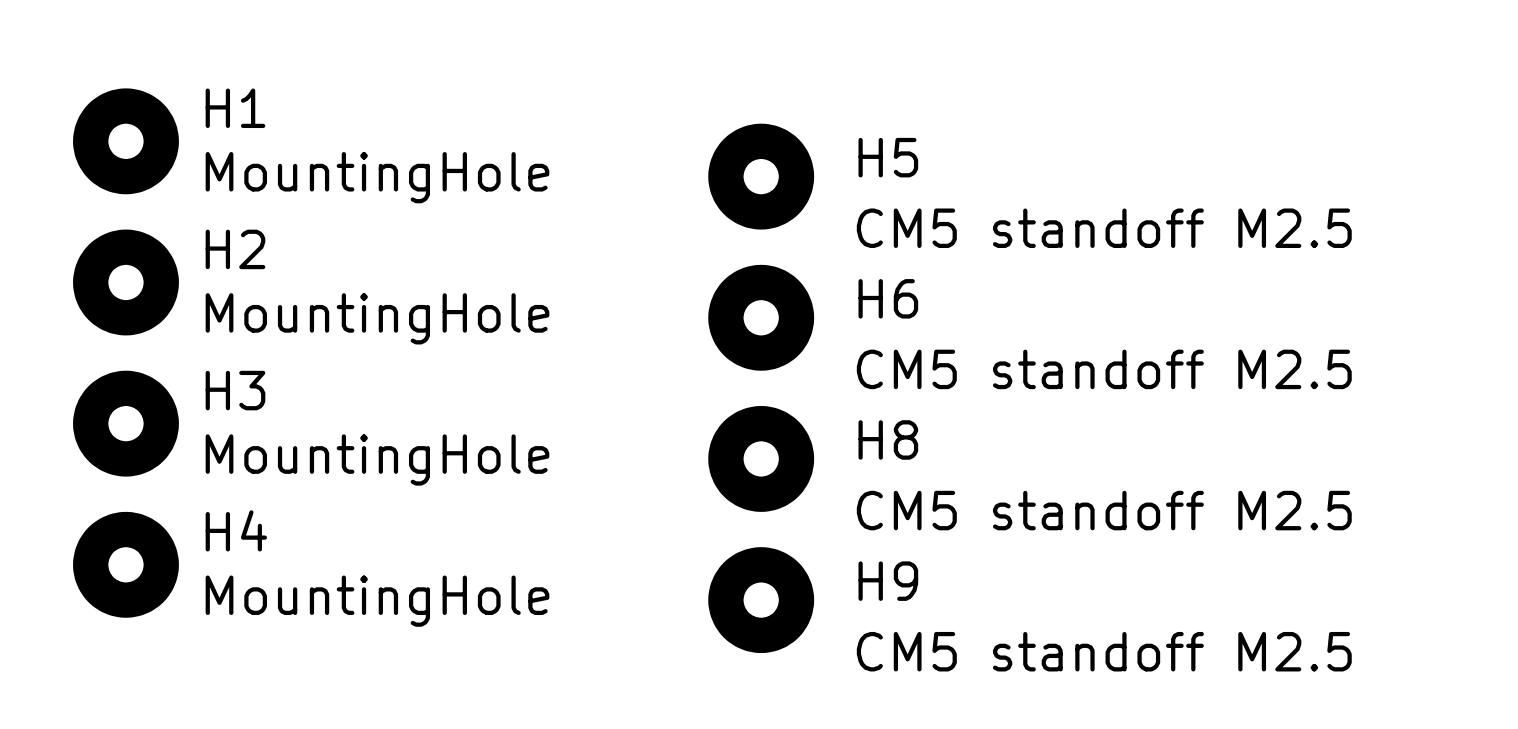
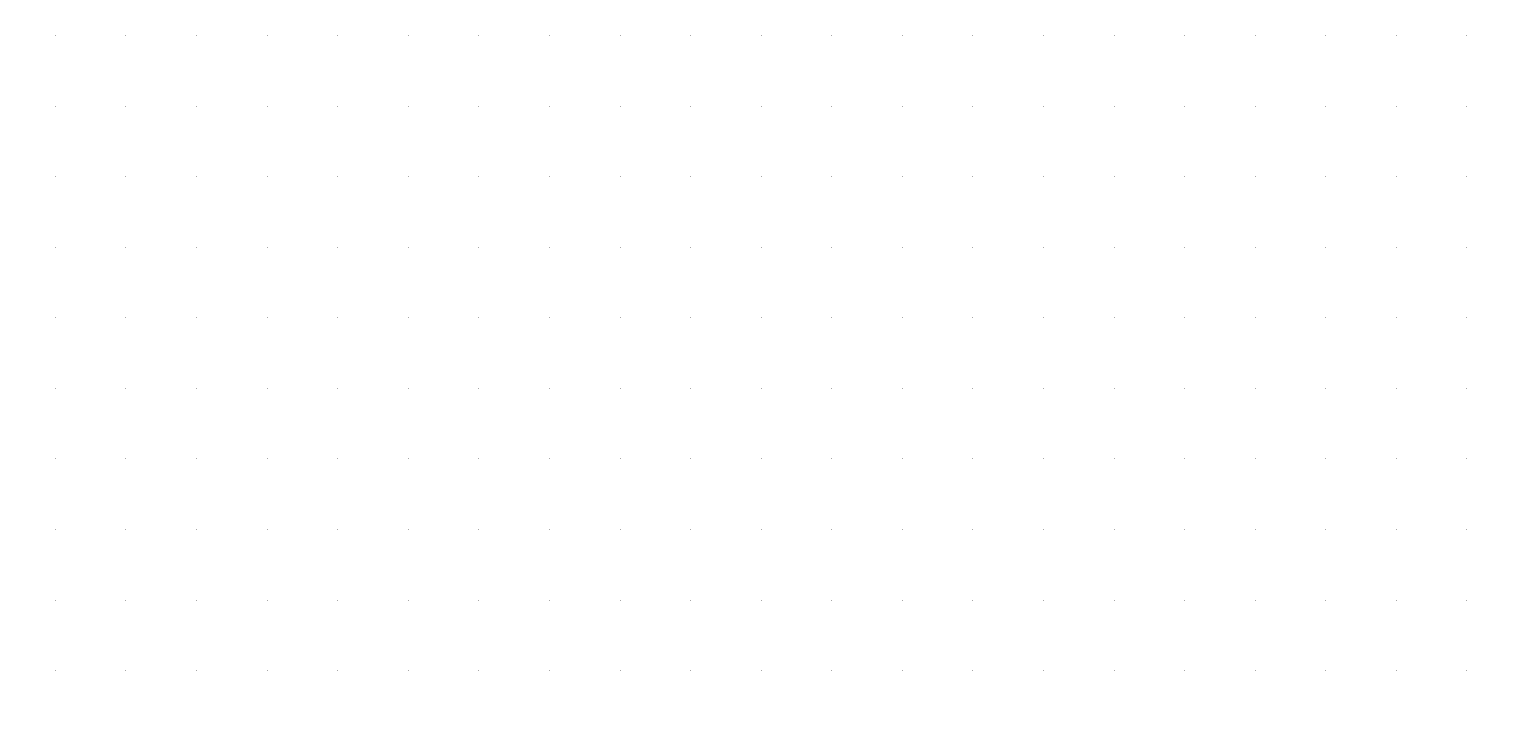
H1: MountingHole (125, 141) -> none
H5: CM5 standoff M2.5 (761, 176) -> none
H2: MountingHole (125, 282) -> none
H6: CM5 standoff M2.5 (761, 317) -> none
H3: MountingHole (125, 423) -> none
H8: CM5 standoff M2.5 (761, 458) -> none
H4: MountingHole (125, 564) -> none
H9: CM5 standoff M2.5 (761, 600) -> none

